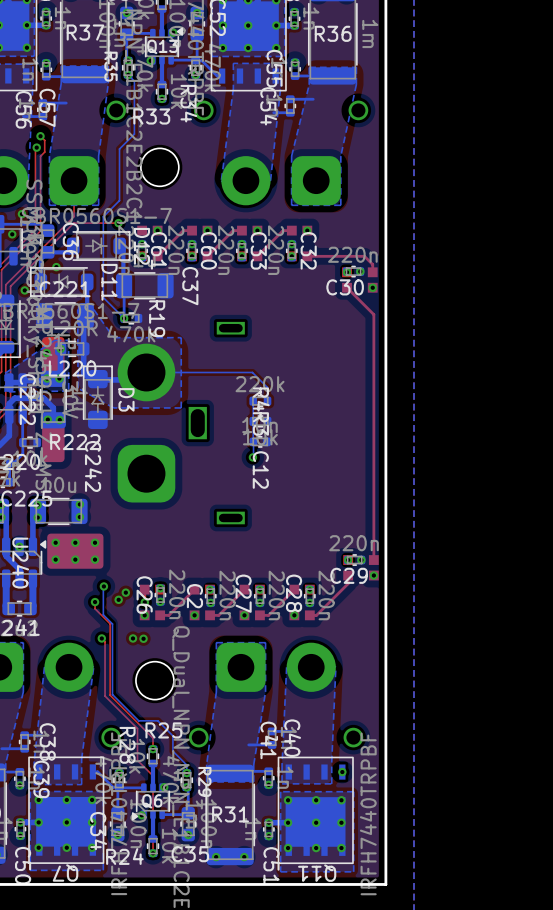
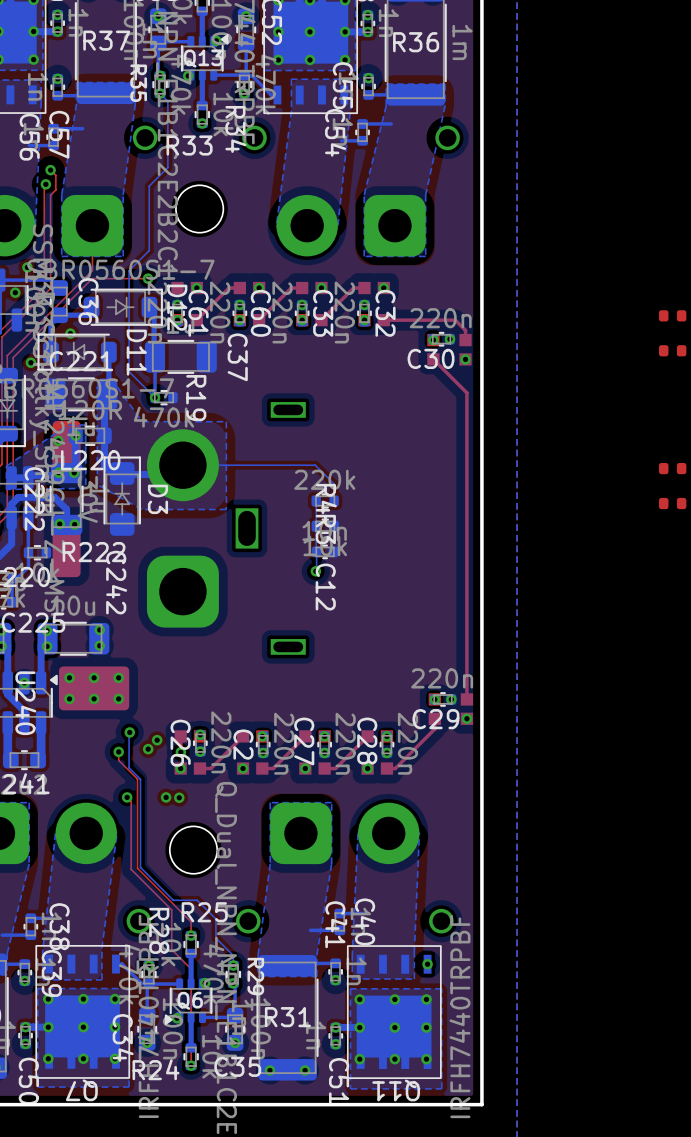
part: none -> (672, 315)
part: none -> (672, 350)
part: none -> (672, 468)
part: none -> (672, 503)

